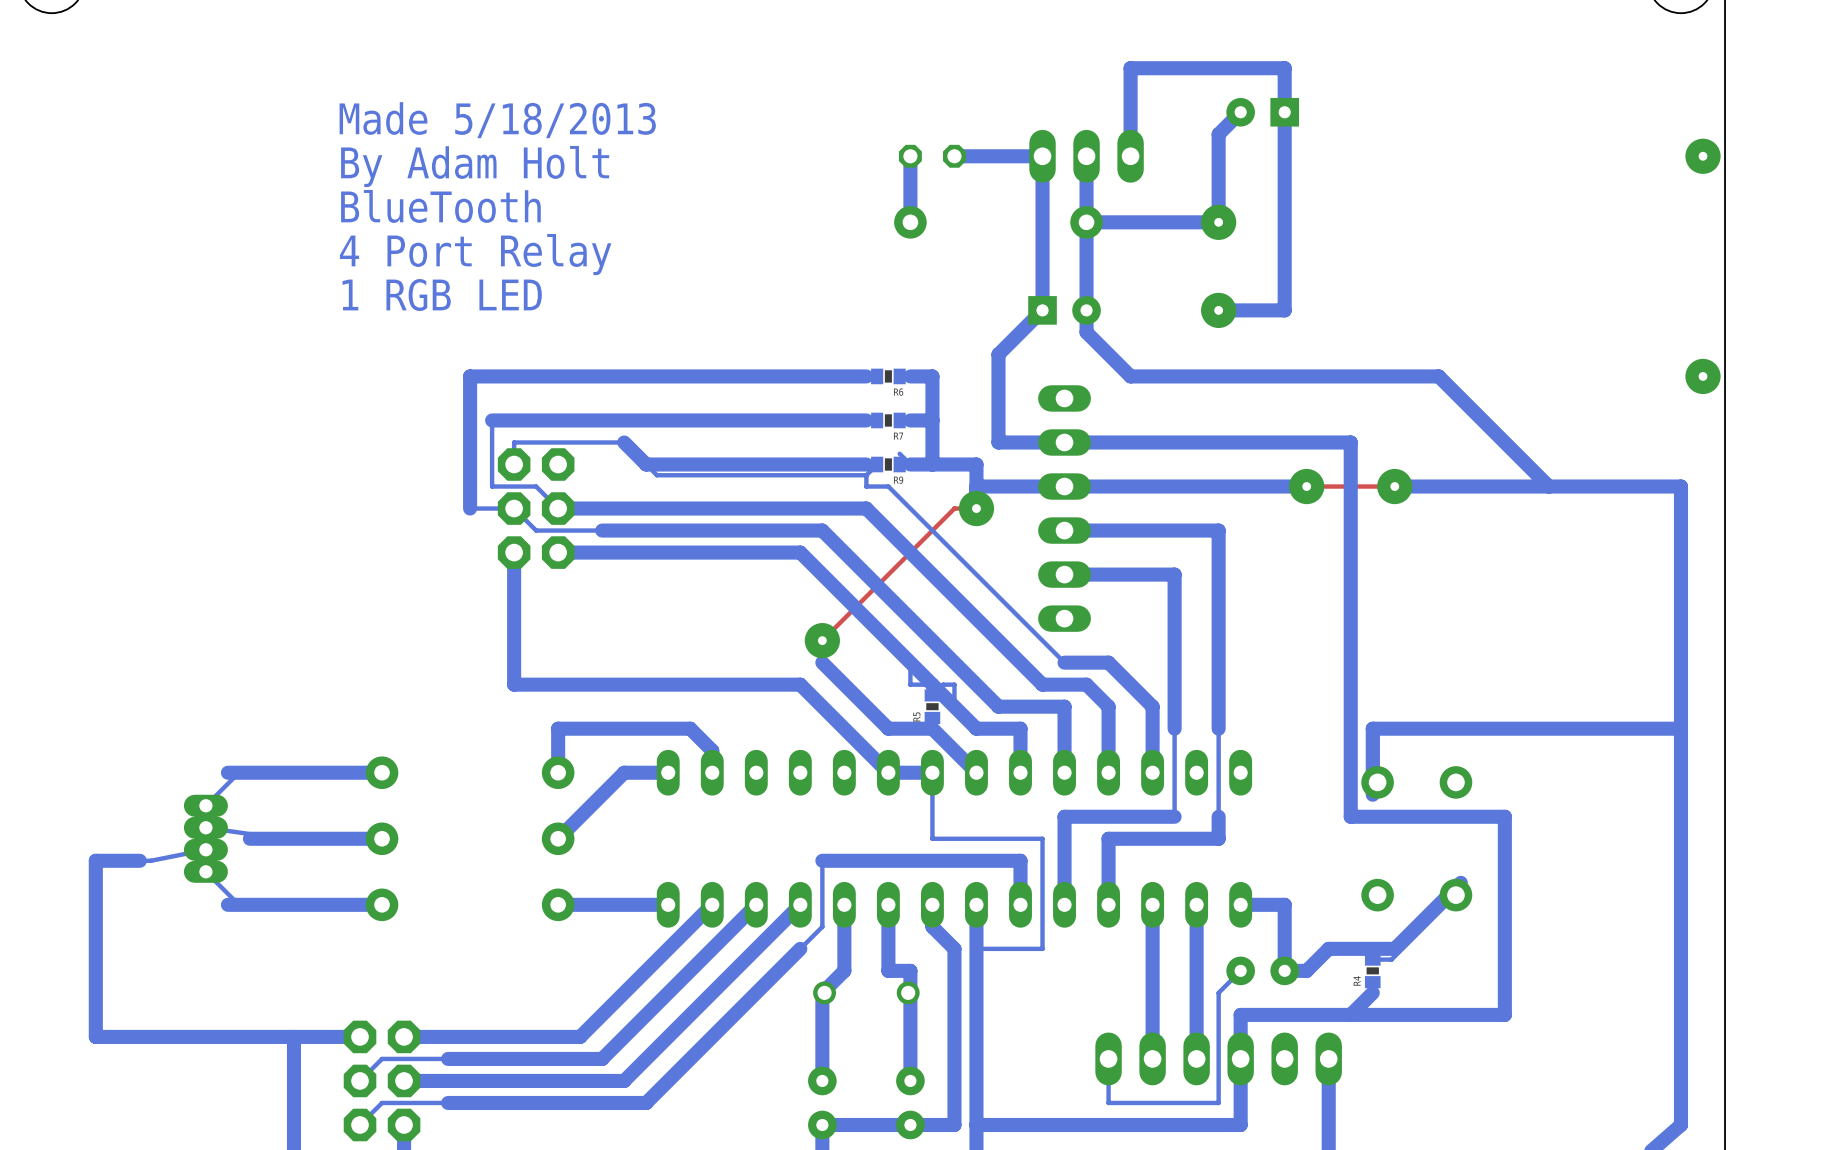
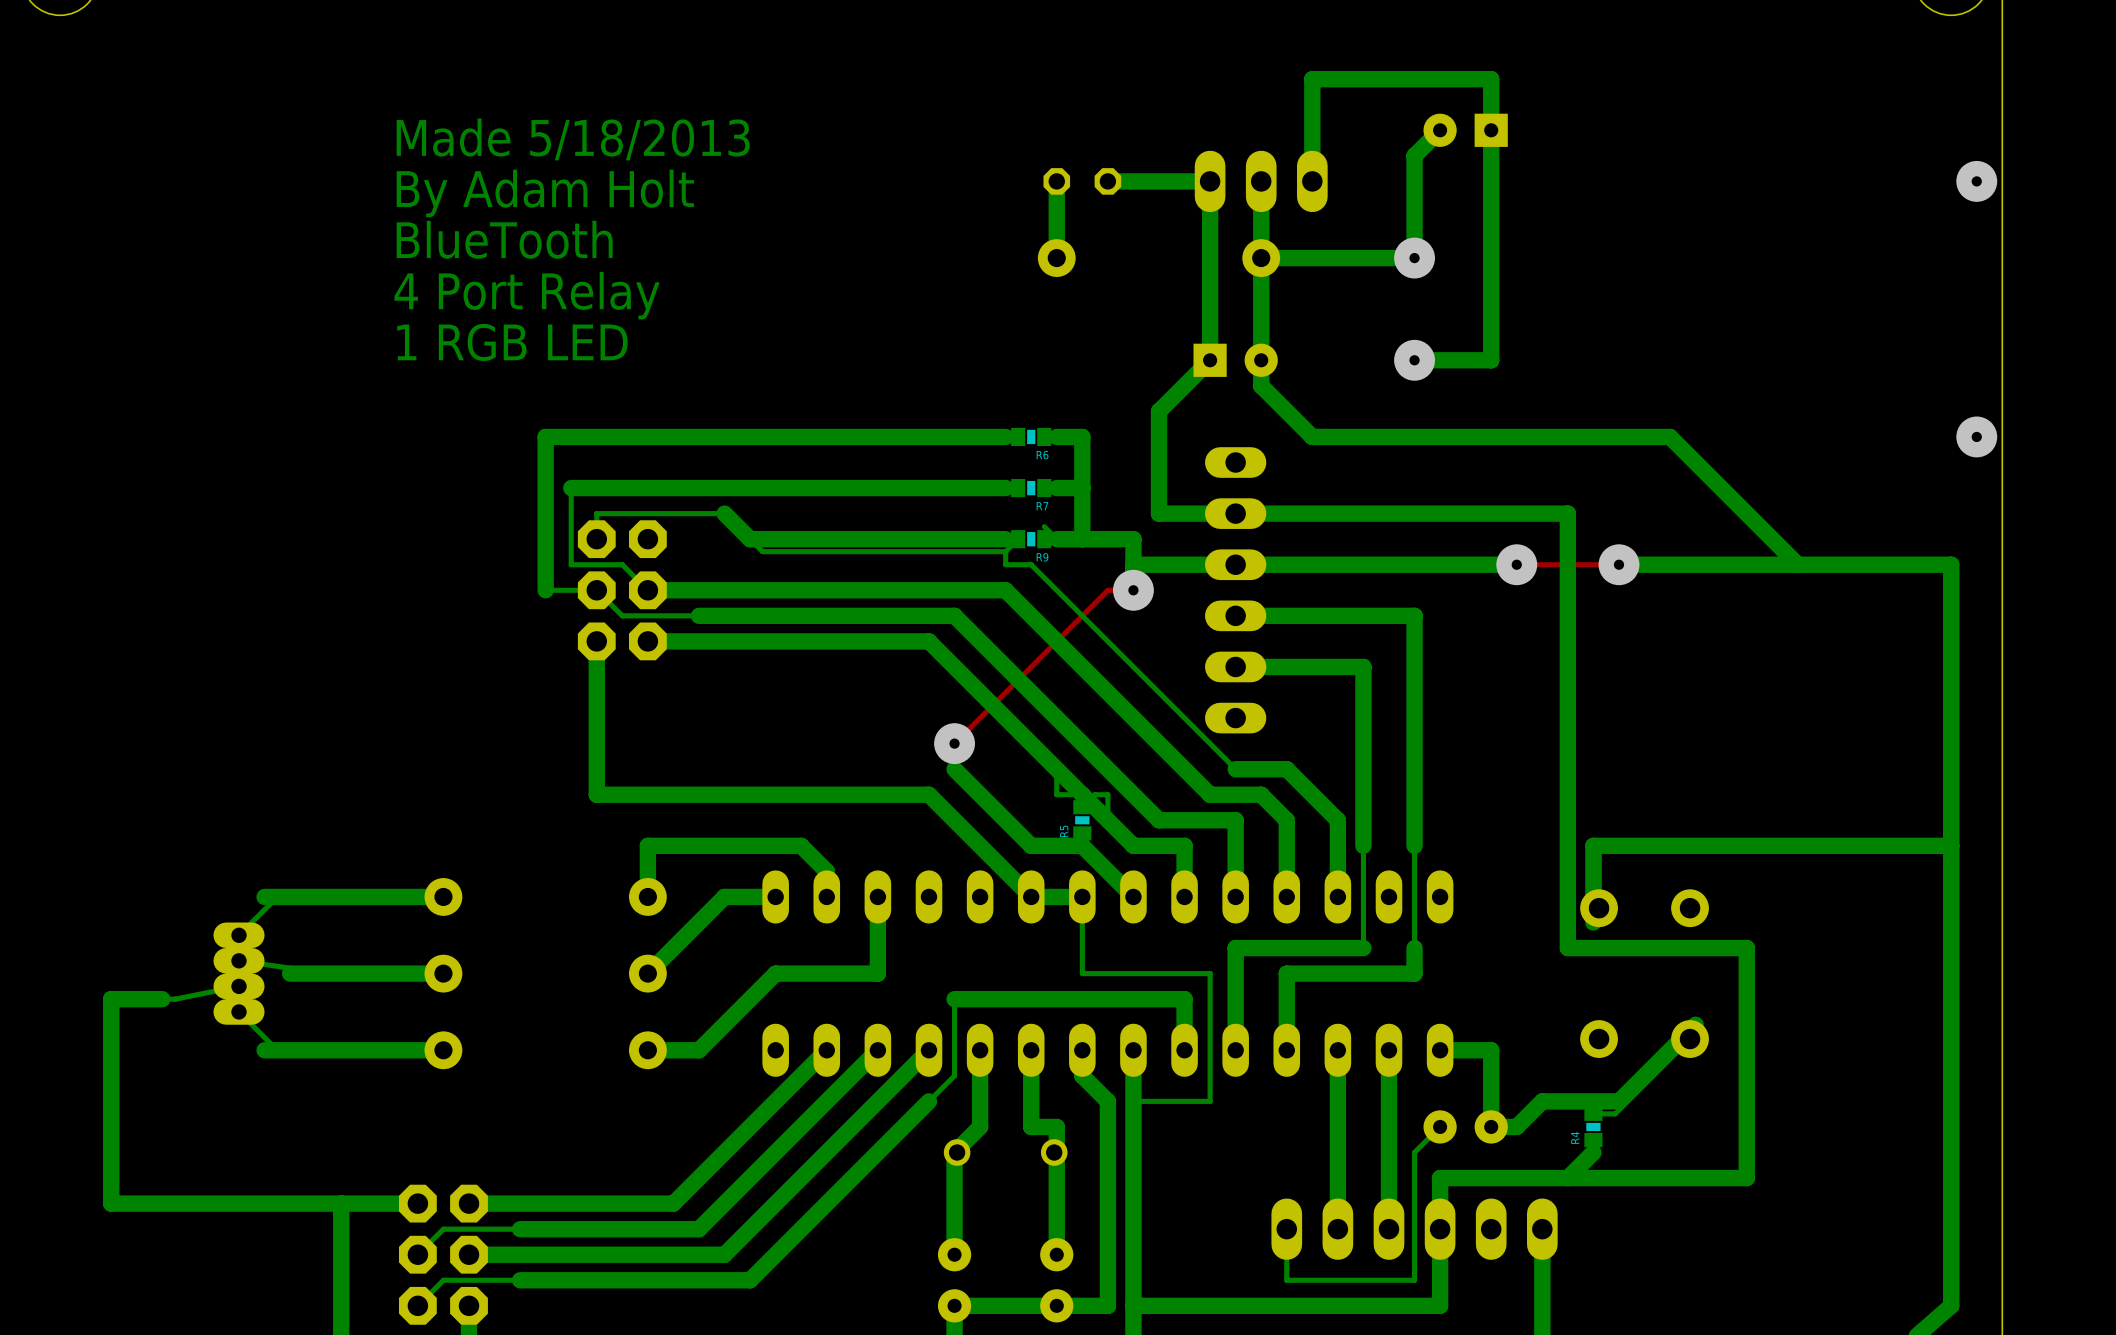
bottom track: (668, 904) (602, 904) -> (877, 896) (877, 973) (775, 973) (699, 1050)

